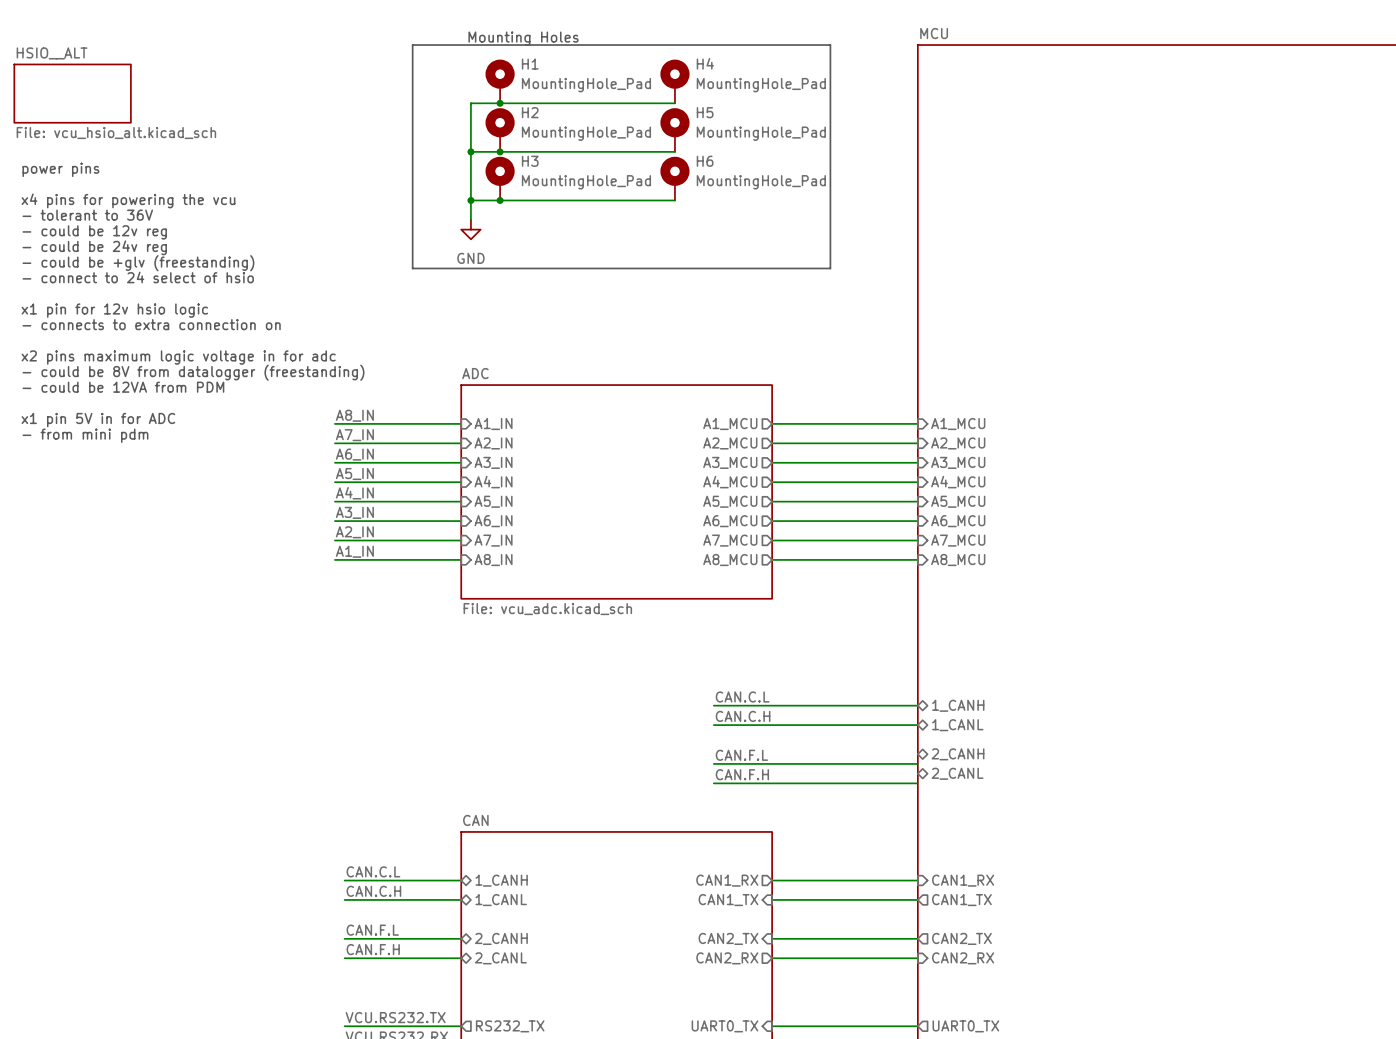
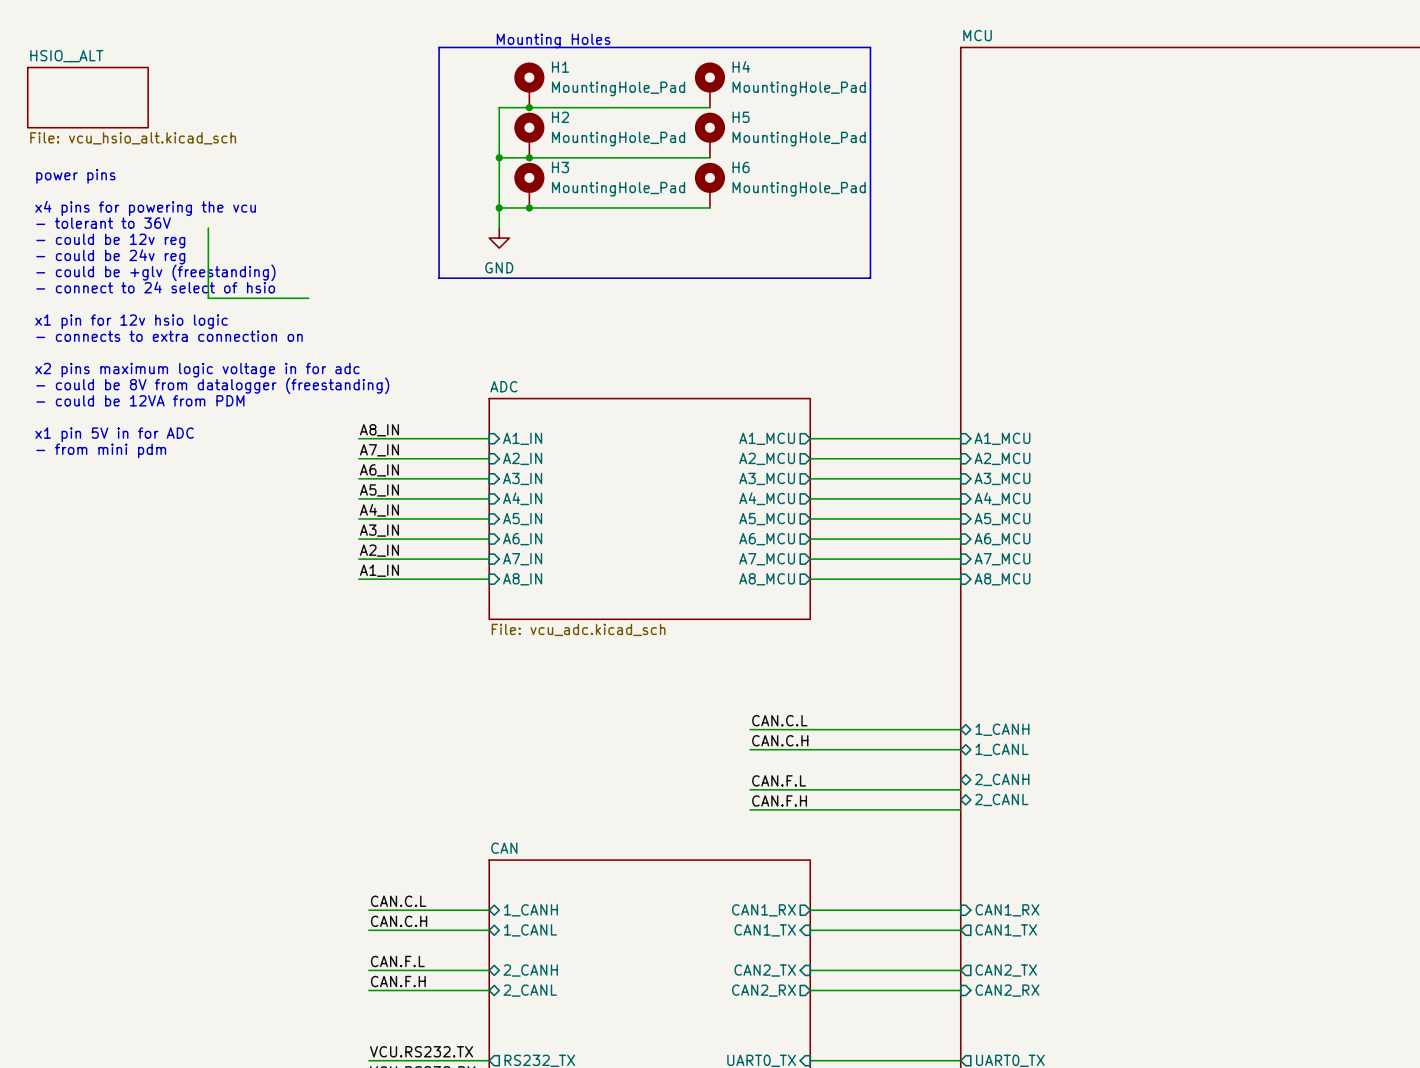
wire: none -> (208, 228) (208, 298) (308, 298)

